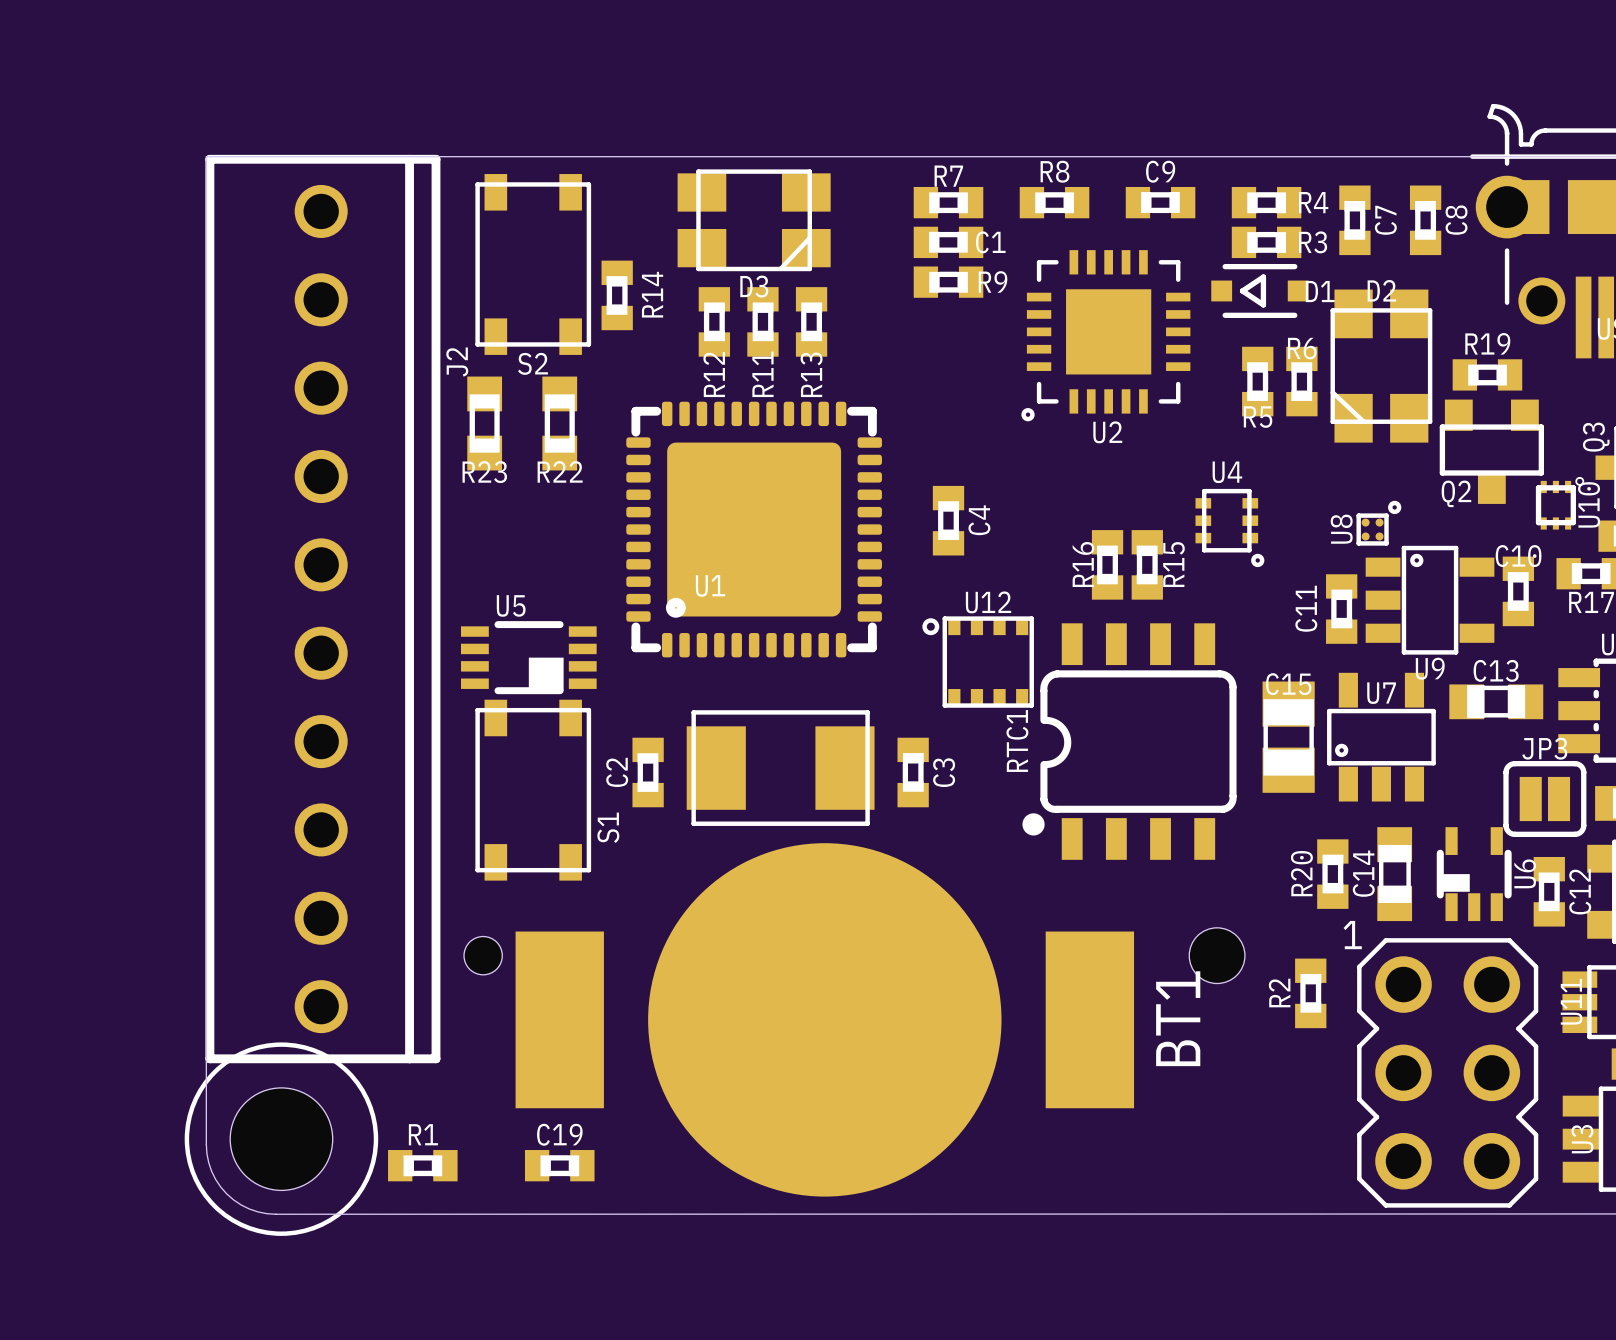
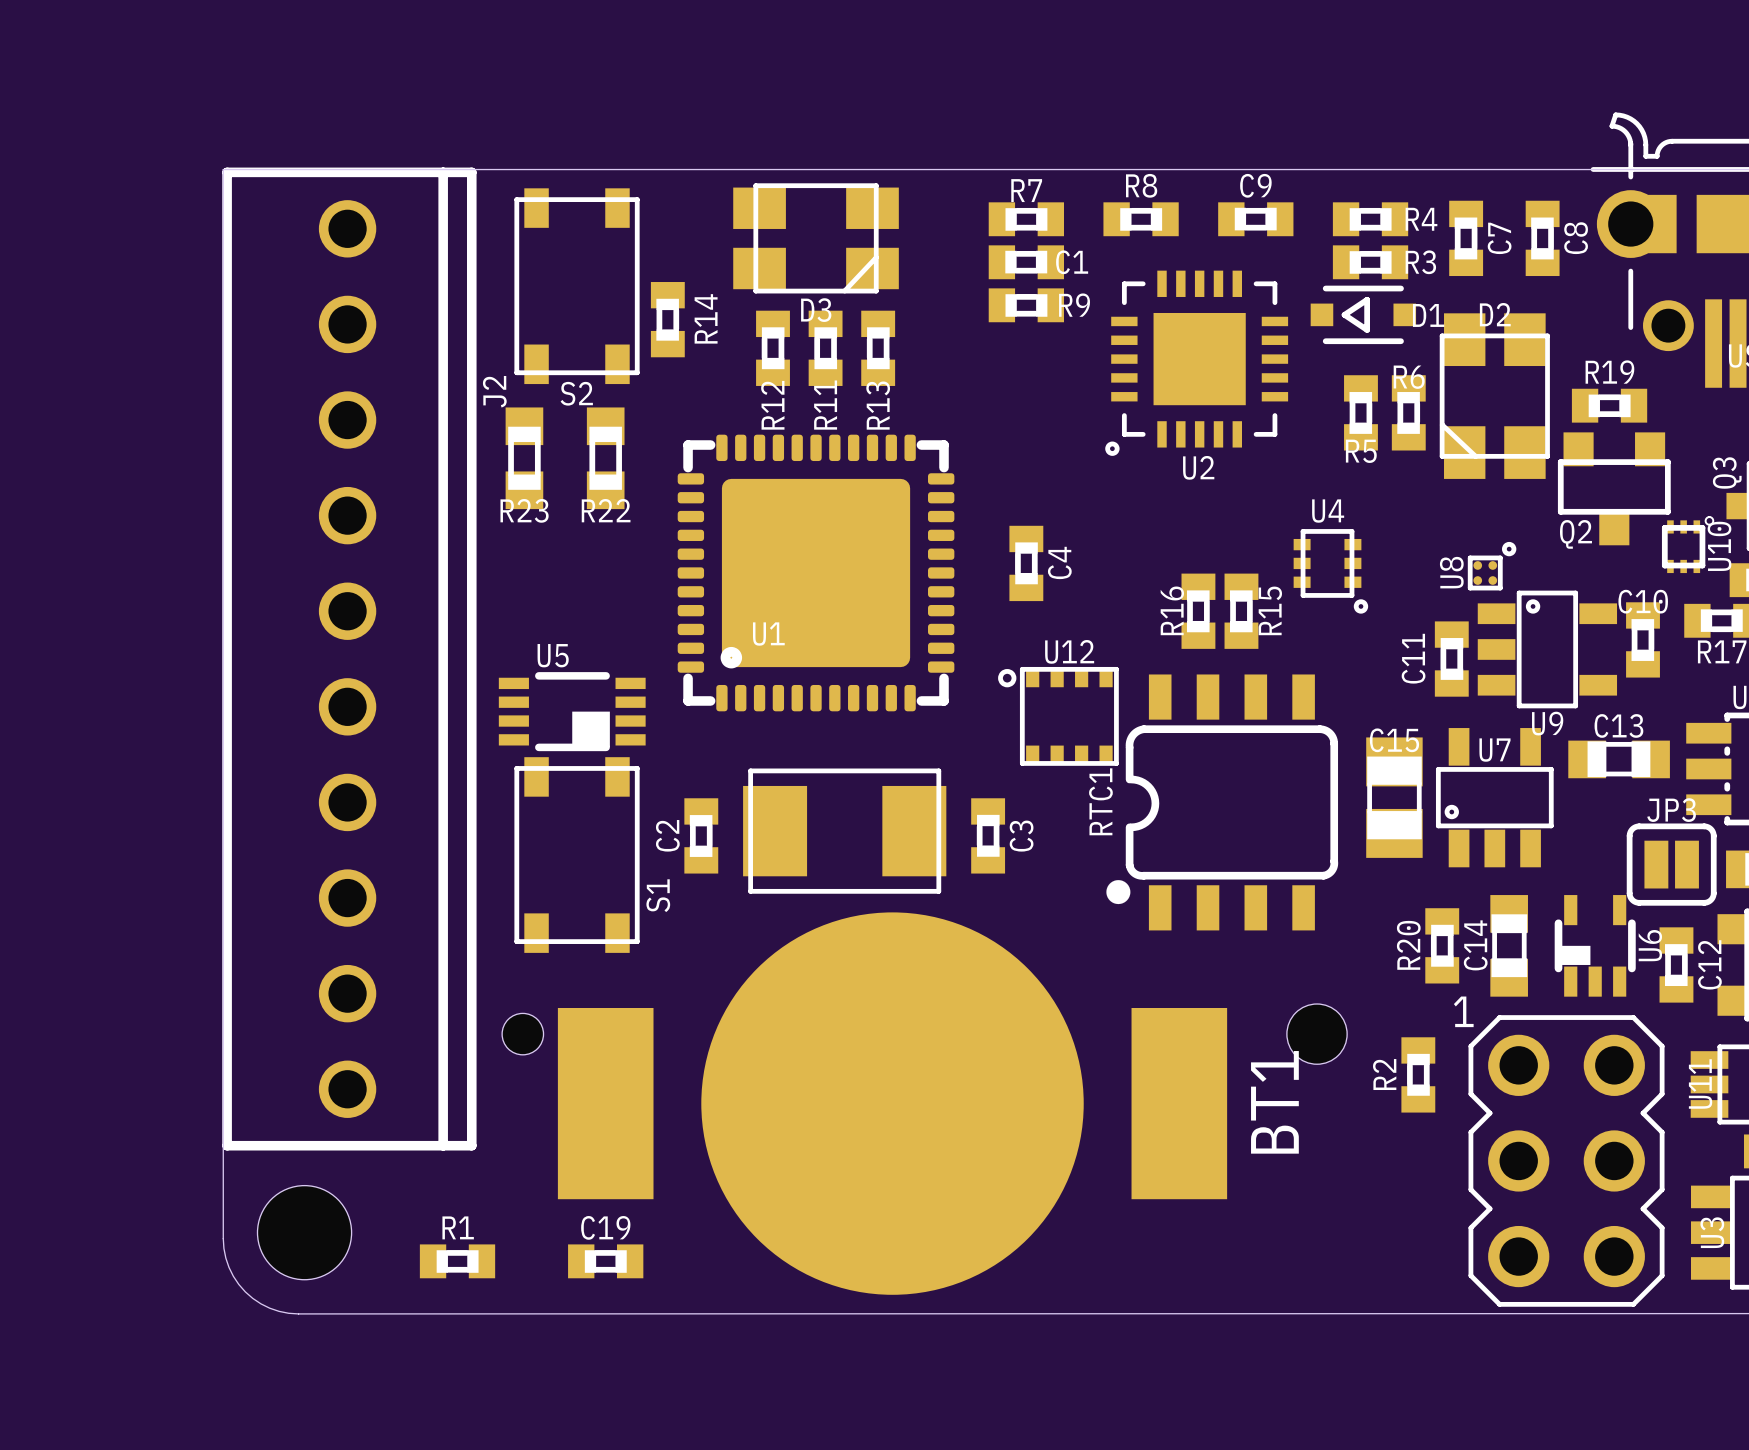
part: (281, 1139) -> none
hole: none -> (304, 1232)

